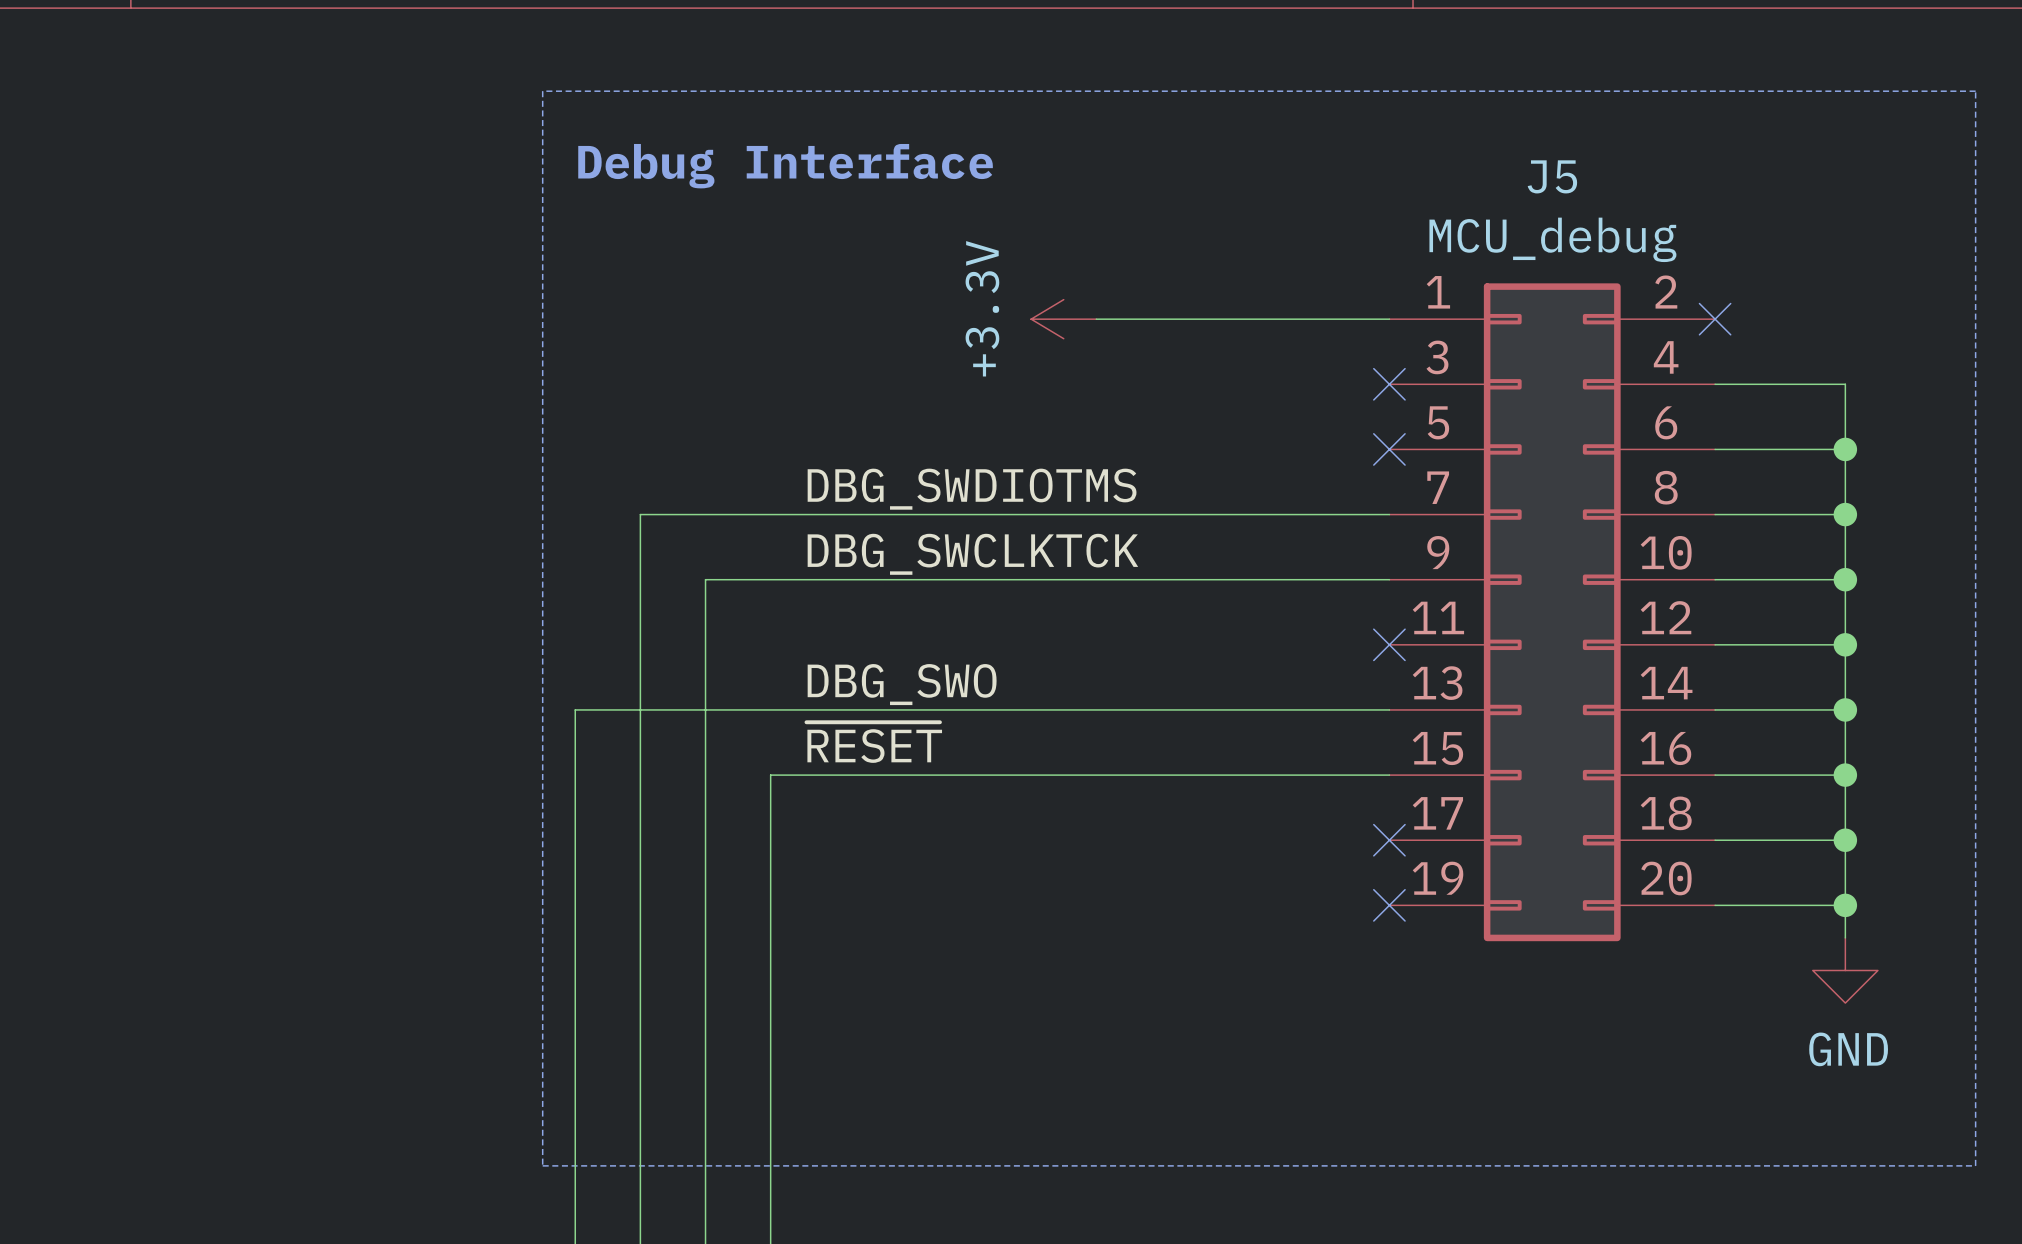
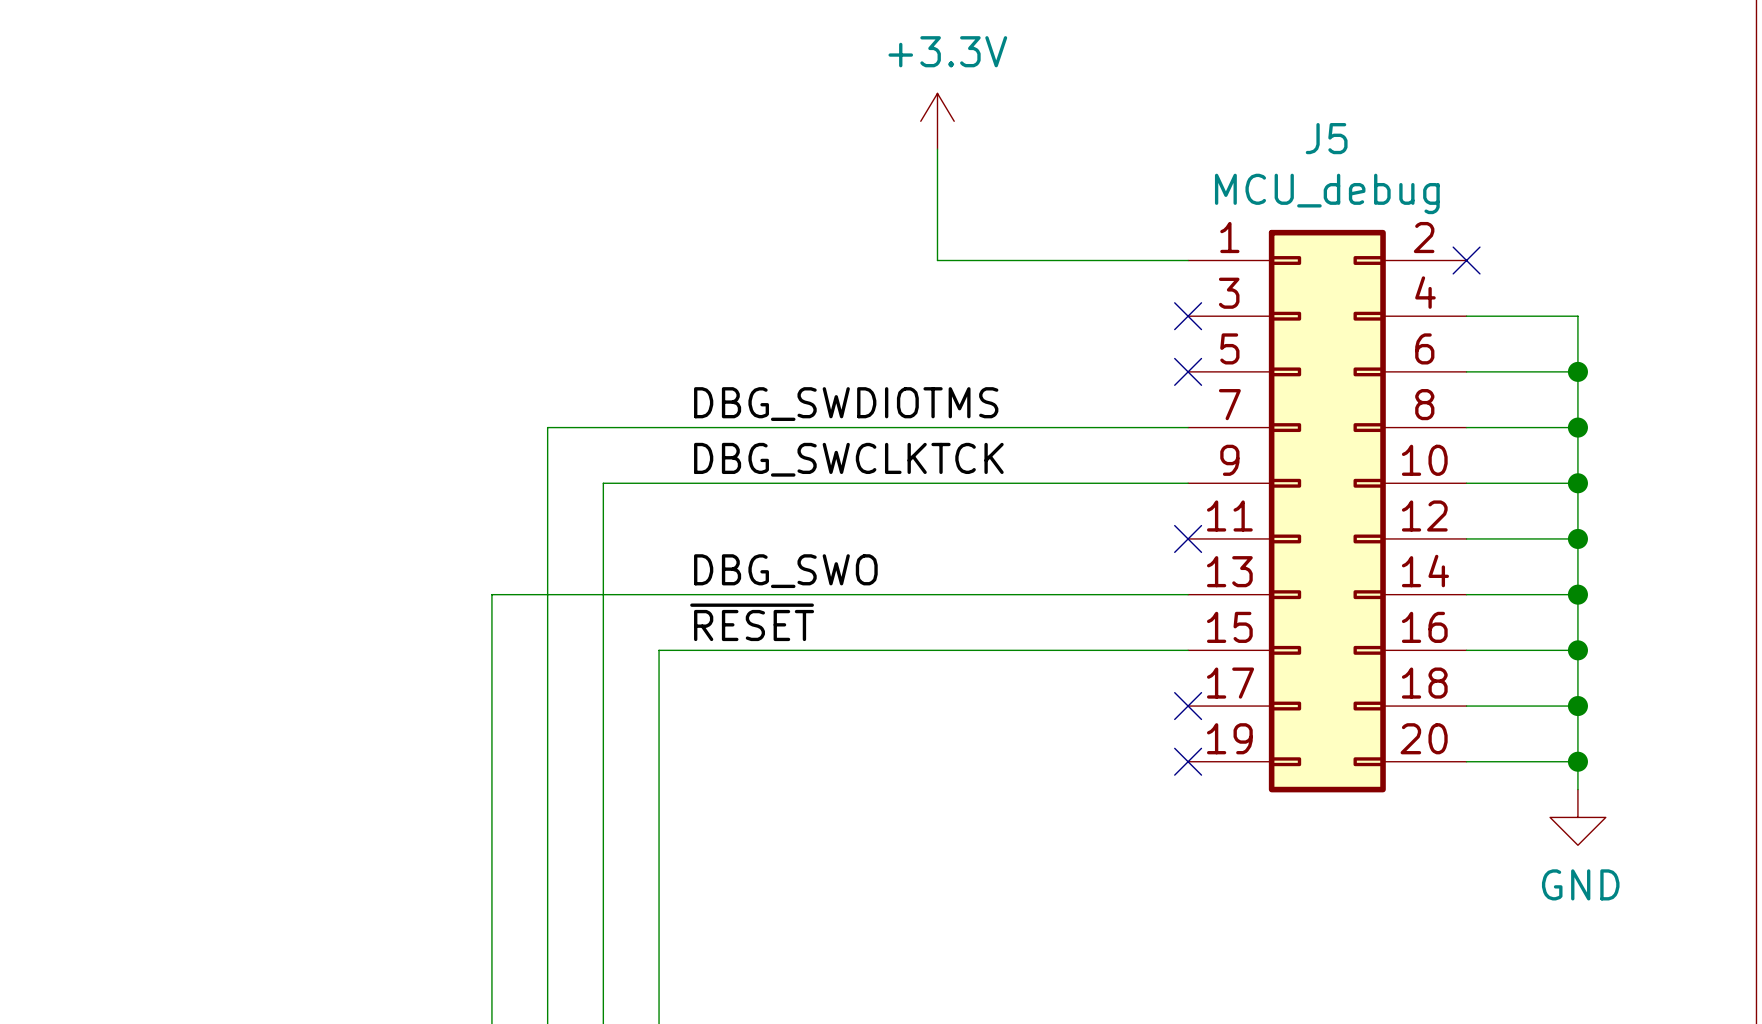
line: (542, 91) (542, 1165) (1975, 1165) (1975, 91) (542, 91) -> none
text: Debug Interface (785, 166) -> none
wire: none -> (937, 149) (937, 260)
power symbol rotation: 0° (1063, 319) -> 90° clockwise (937, 121)
power symbol position: +3.3V (1063, 319) -> +3.3V (937, 121)

